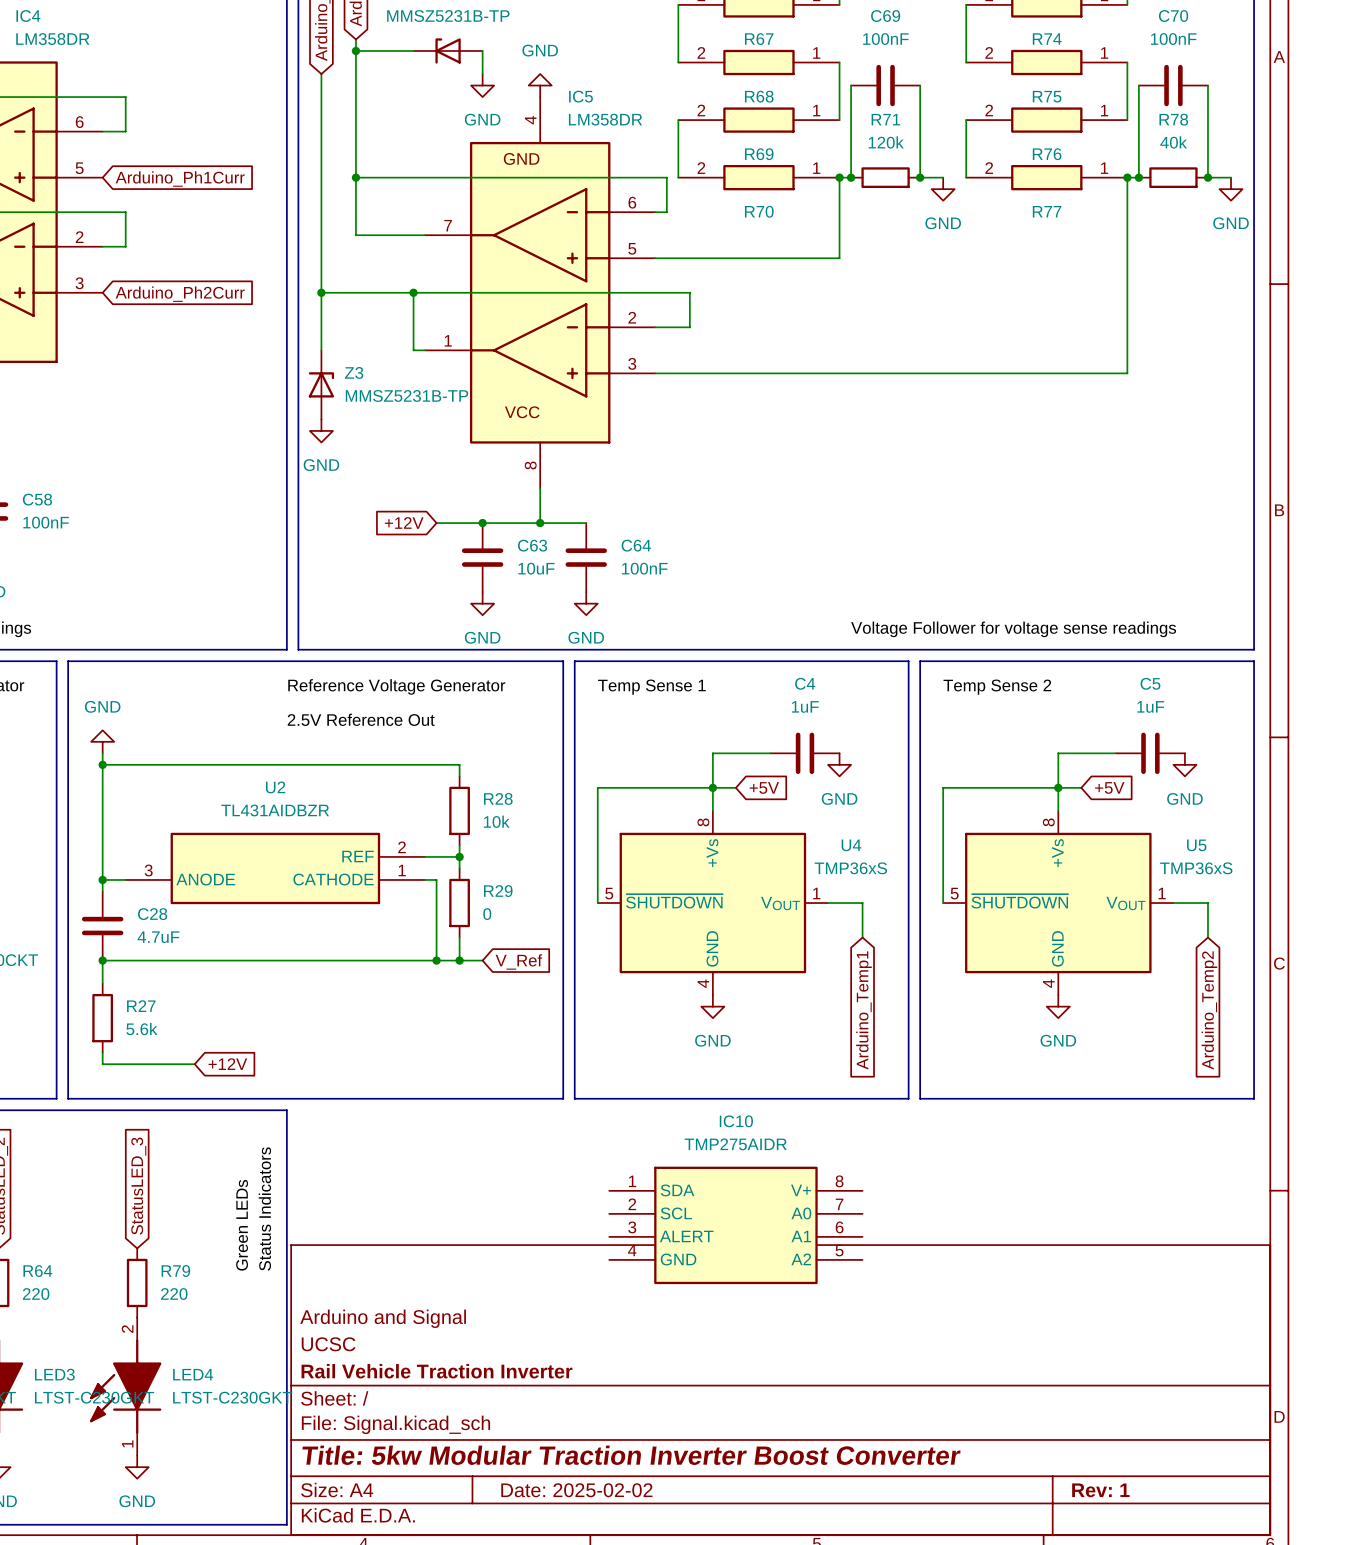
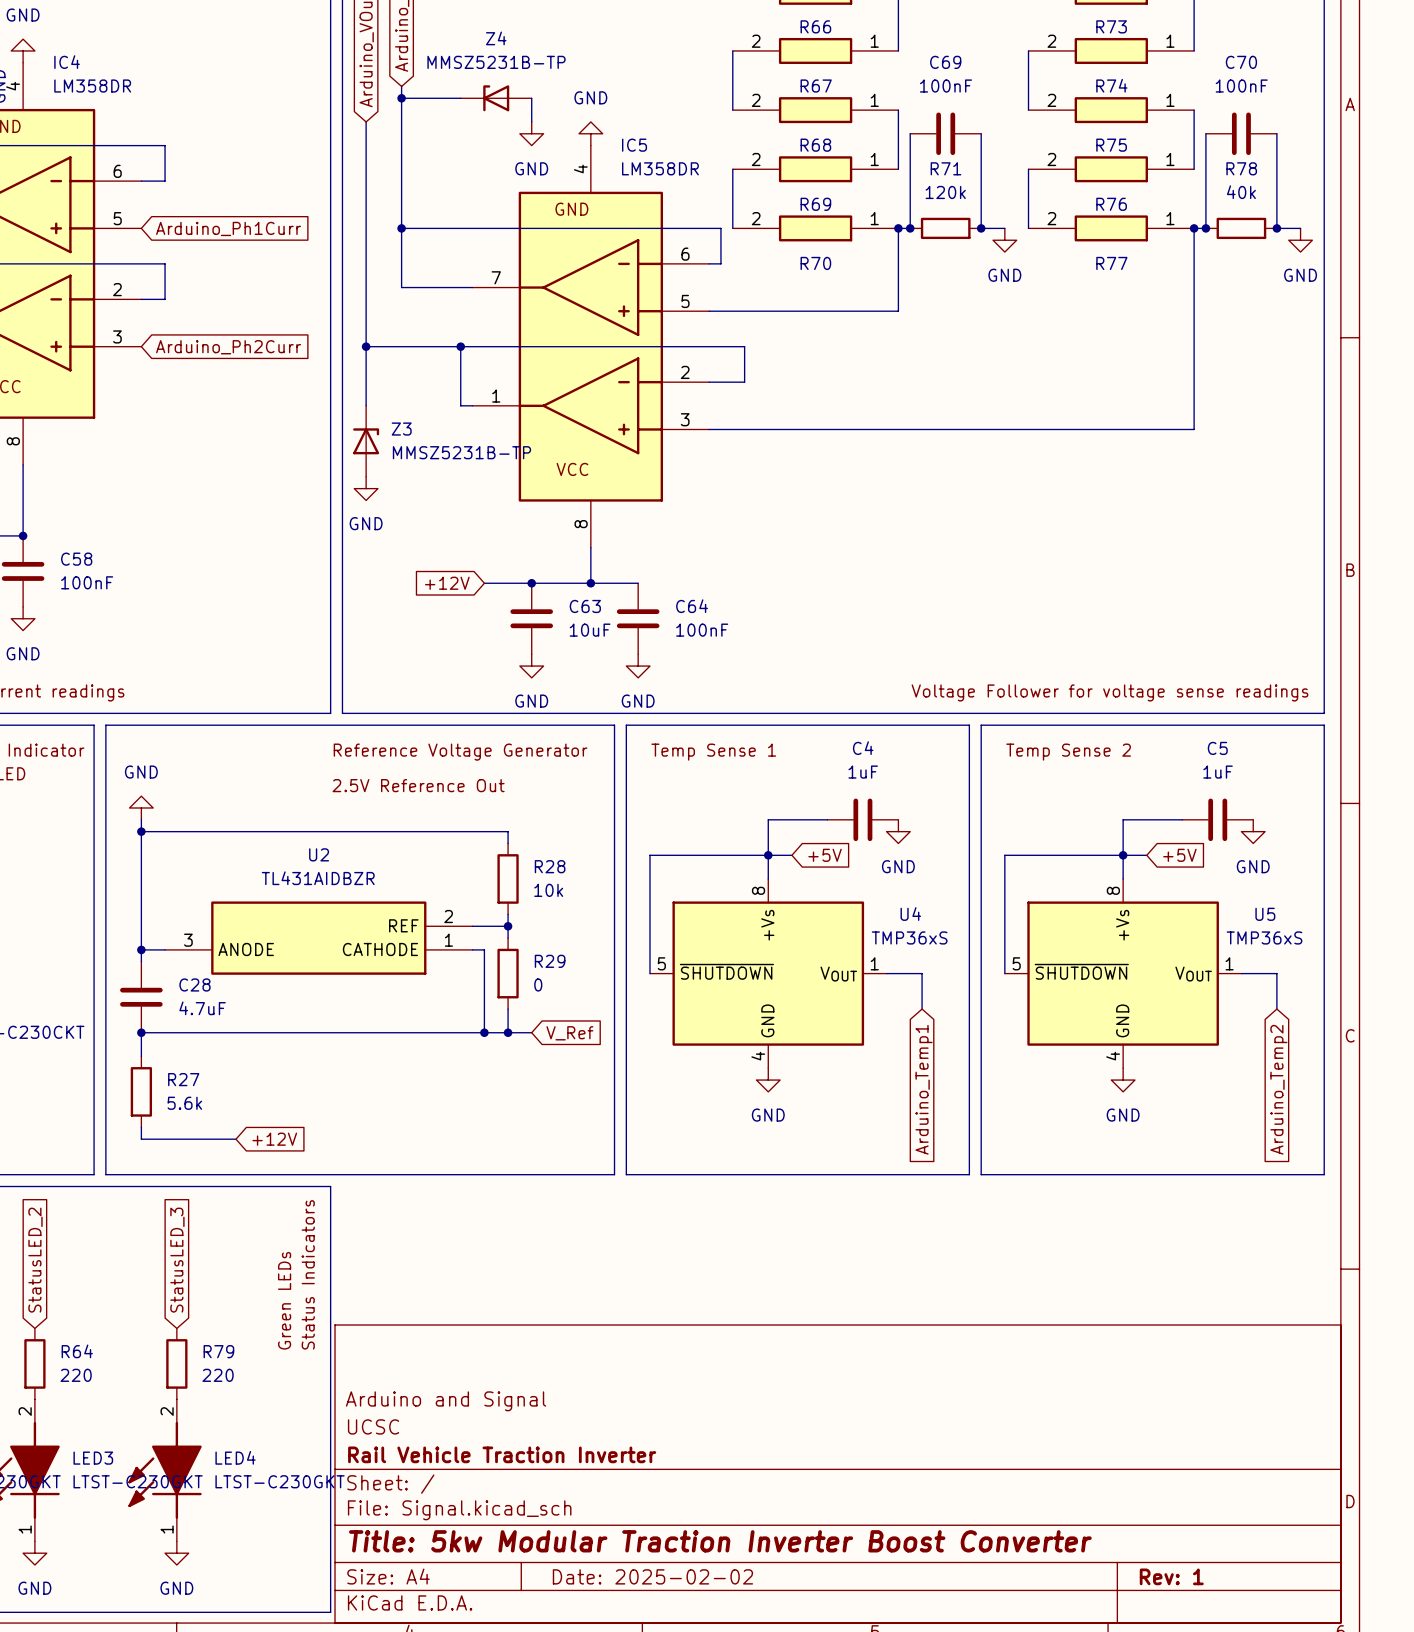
IC10: TMP275AIDR (735, 1225) -> none

